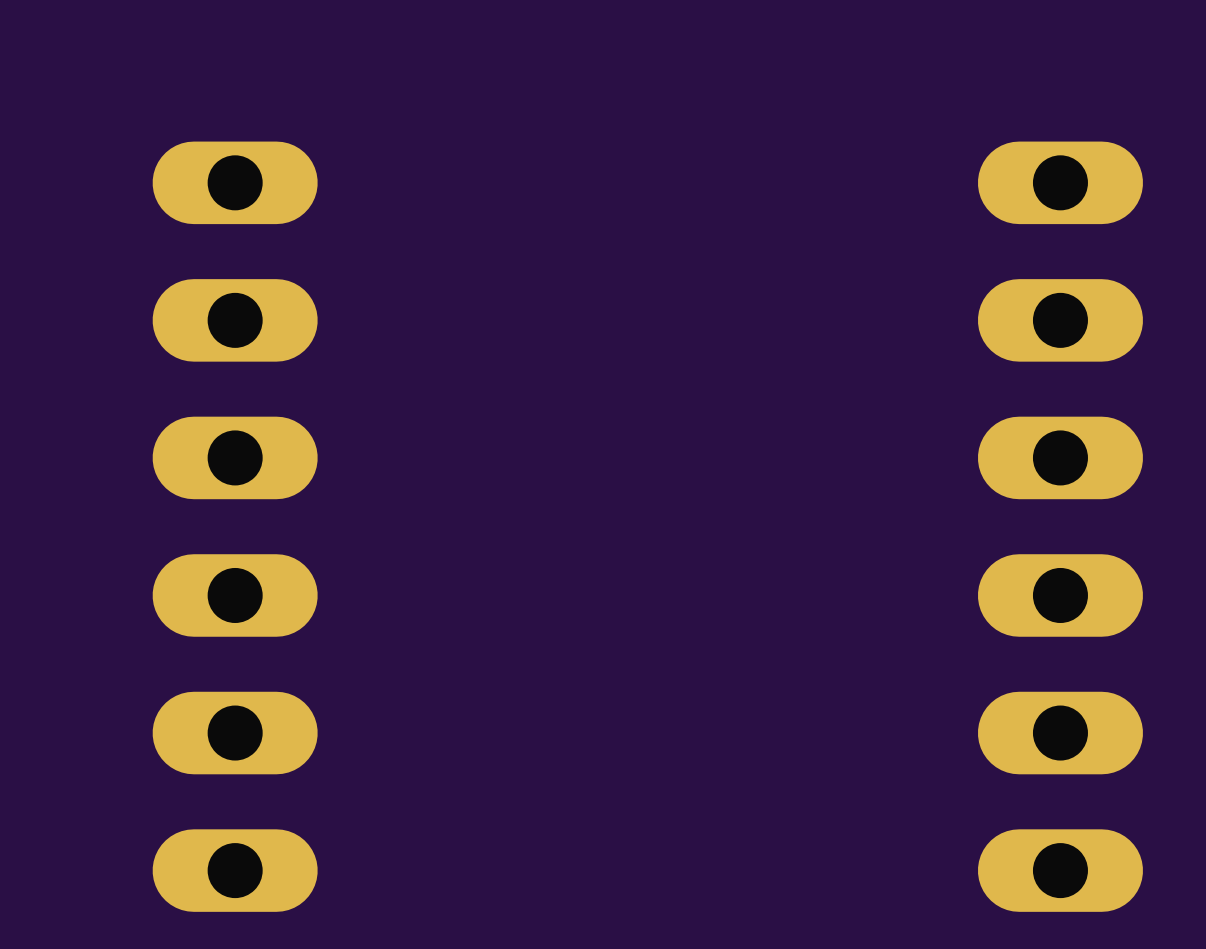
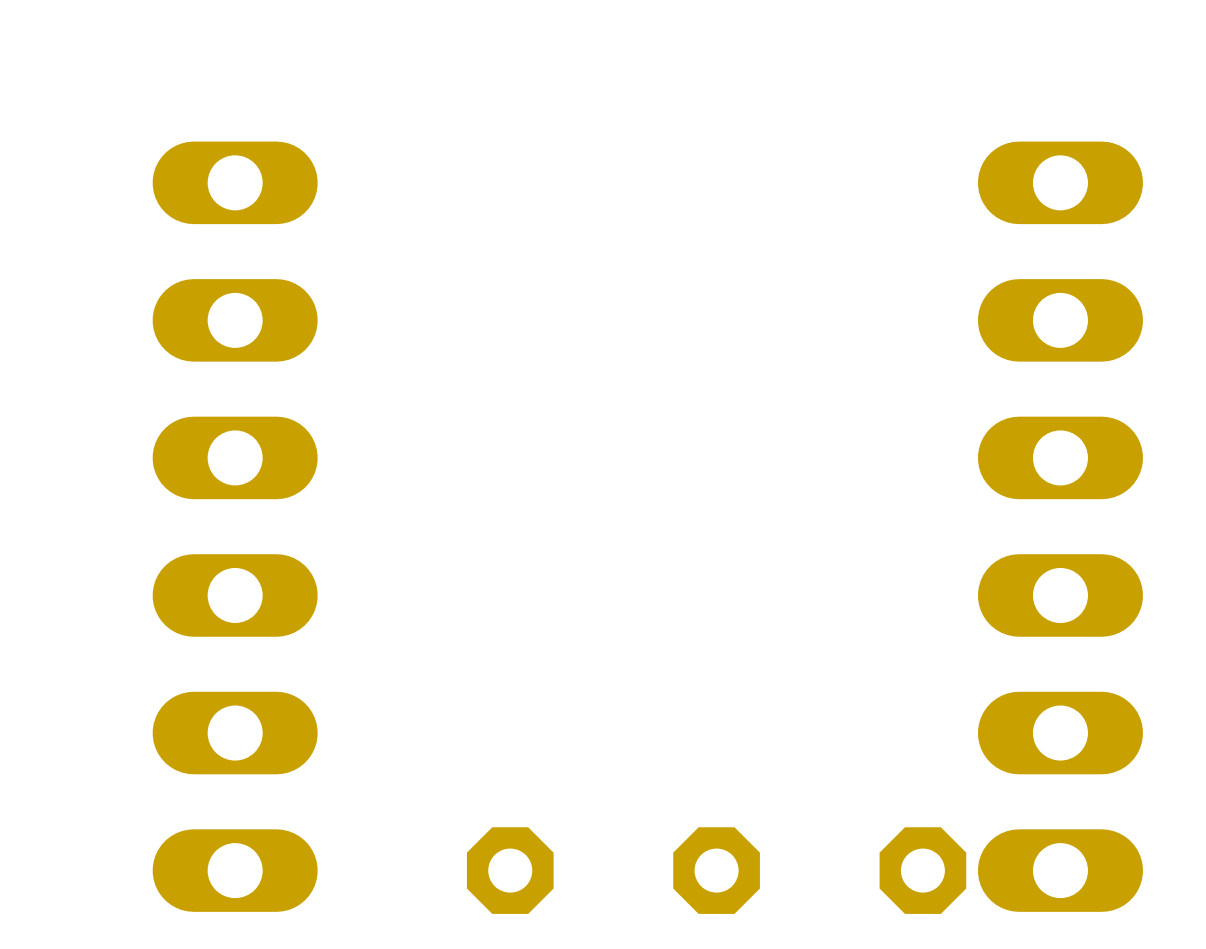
part: none -> (510, 870)
part: none -> (716, 870)
part: none -> (922, 870)

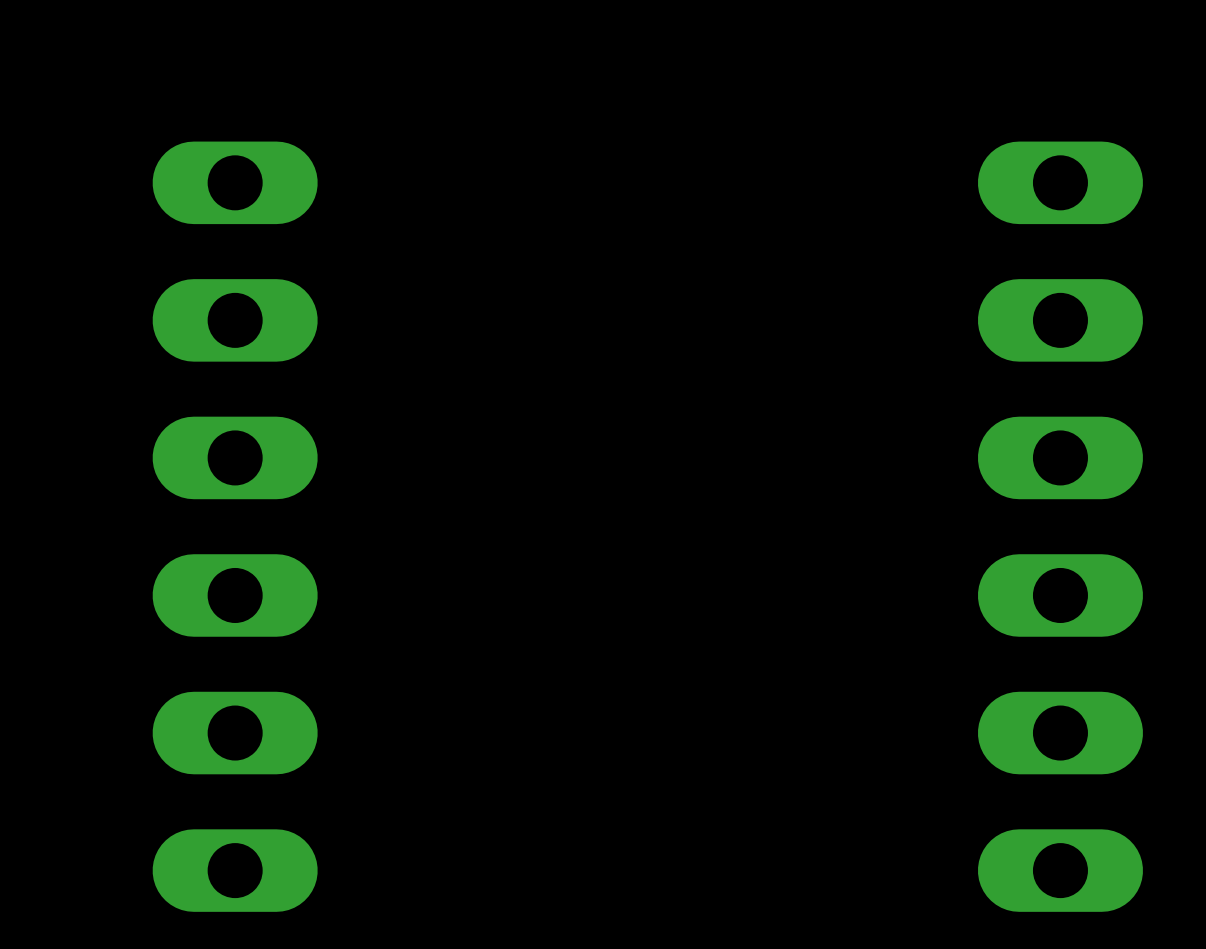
part: (510, 870) -> none
part: (716, 870) -> none
part: (922, 870) -> none

